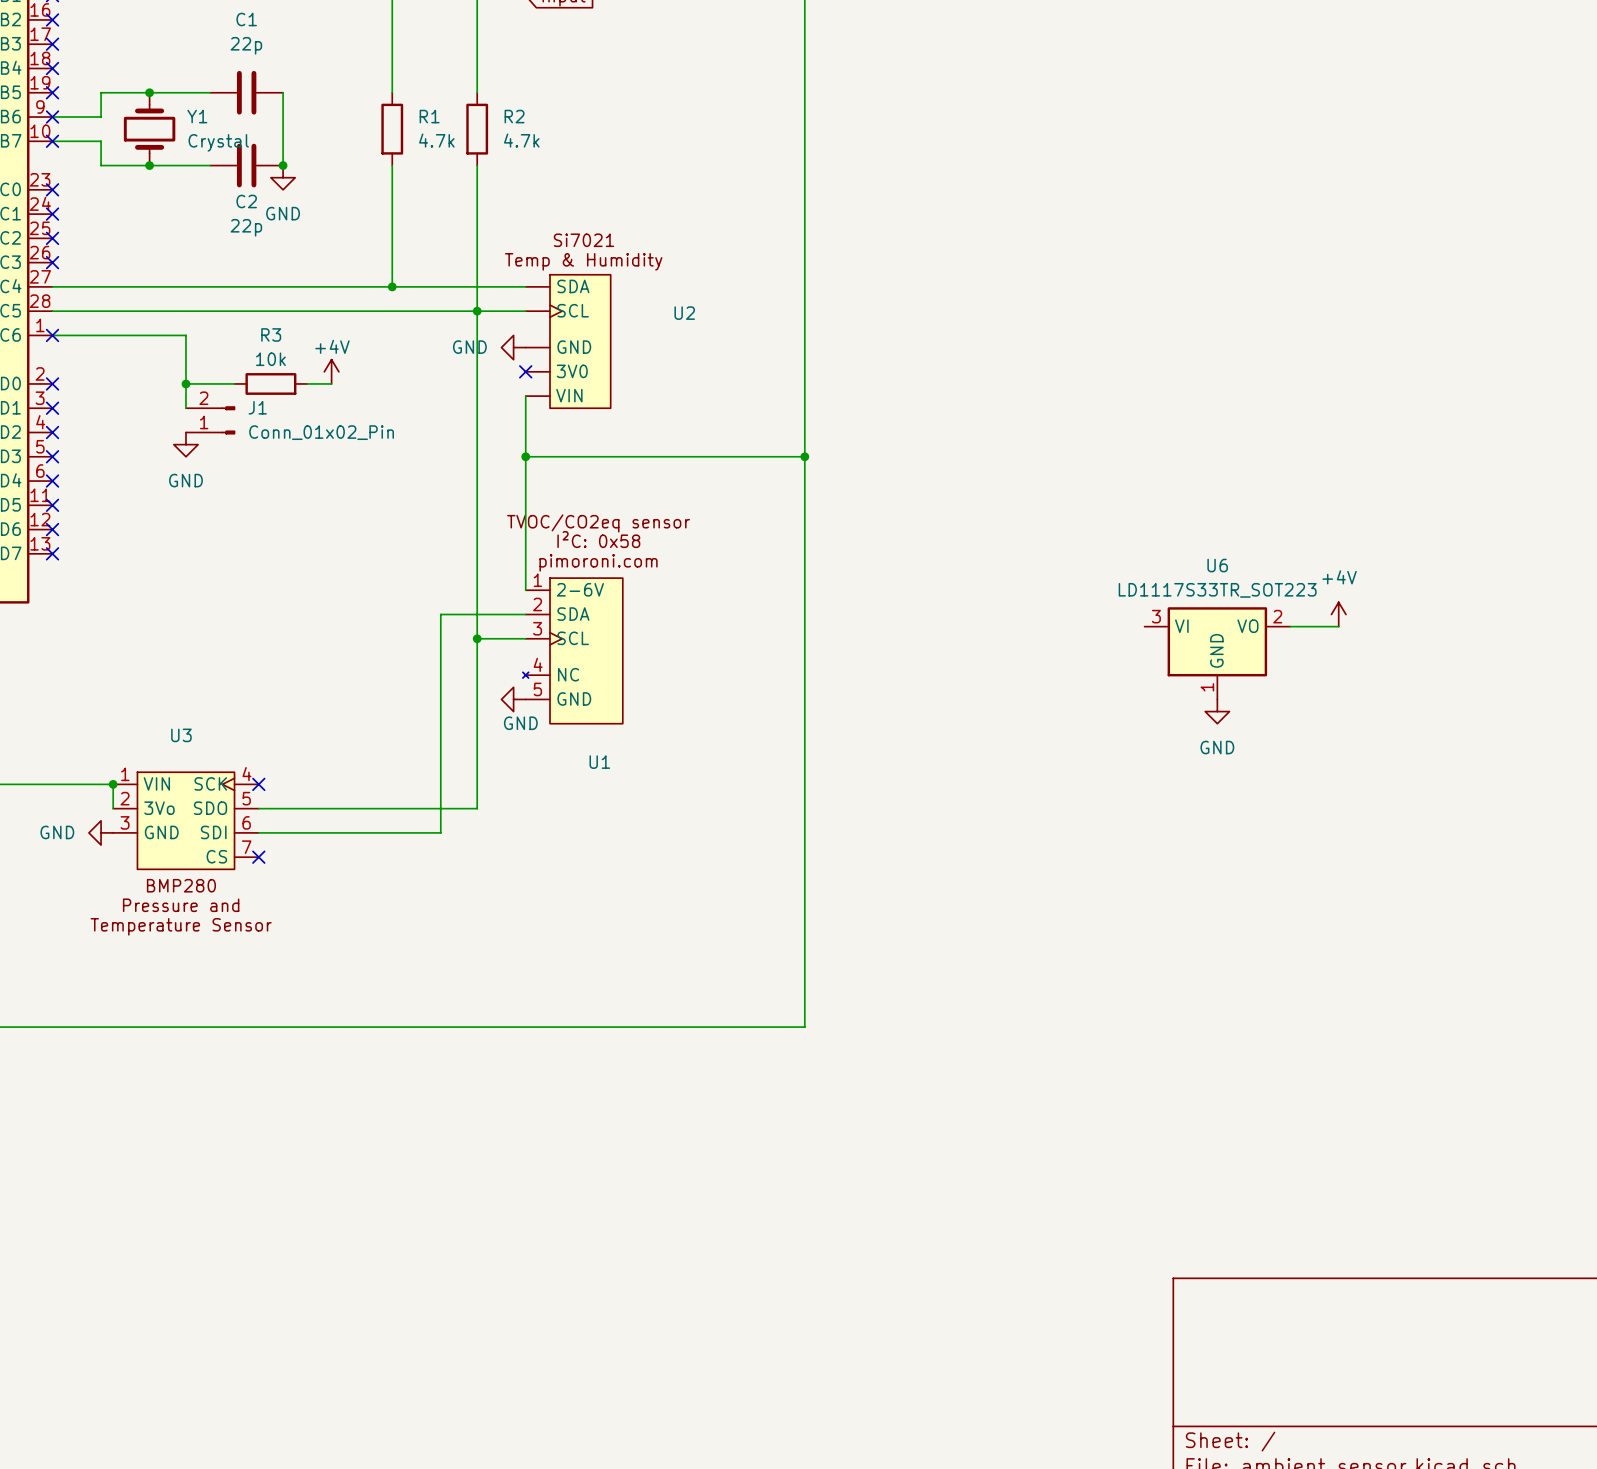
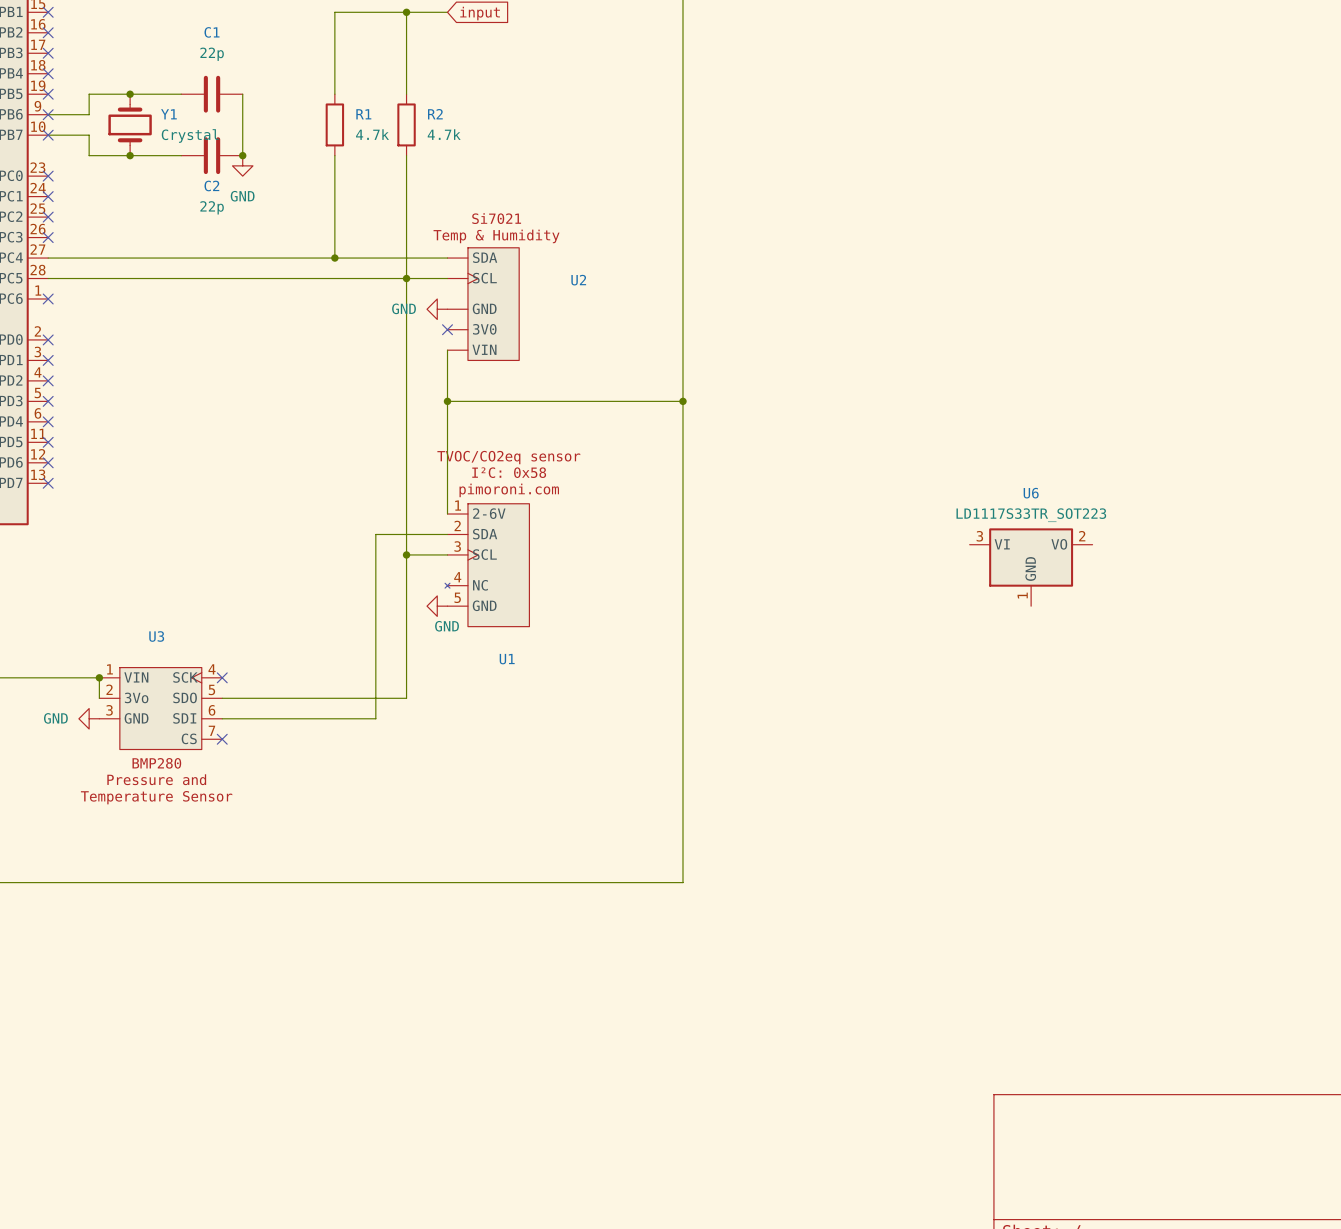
wire: (52, 335) (185, 335) (185, 408) -> none
power symbol: +4V (331, 371) -> none
wire: (185, 383) (234, 383) -> none
junction: (185, 383) -> none
R3: 10k (270, 383) -> none
wire: (307, 383) (331, 383) -> none
J1: Conn_01x02_Pin (210, 420) -> none
power symbol: GND (185, 444) -> none
power symbol: +4V (1338, 614) -> none
wire: (1290, 626) (1338, 626) -> none
power symbol: GND (1217, 711) -> none

